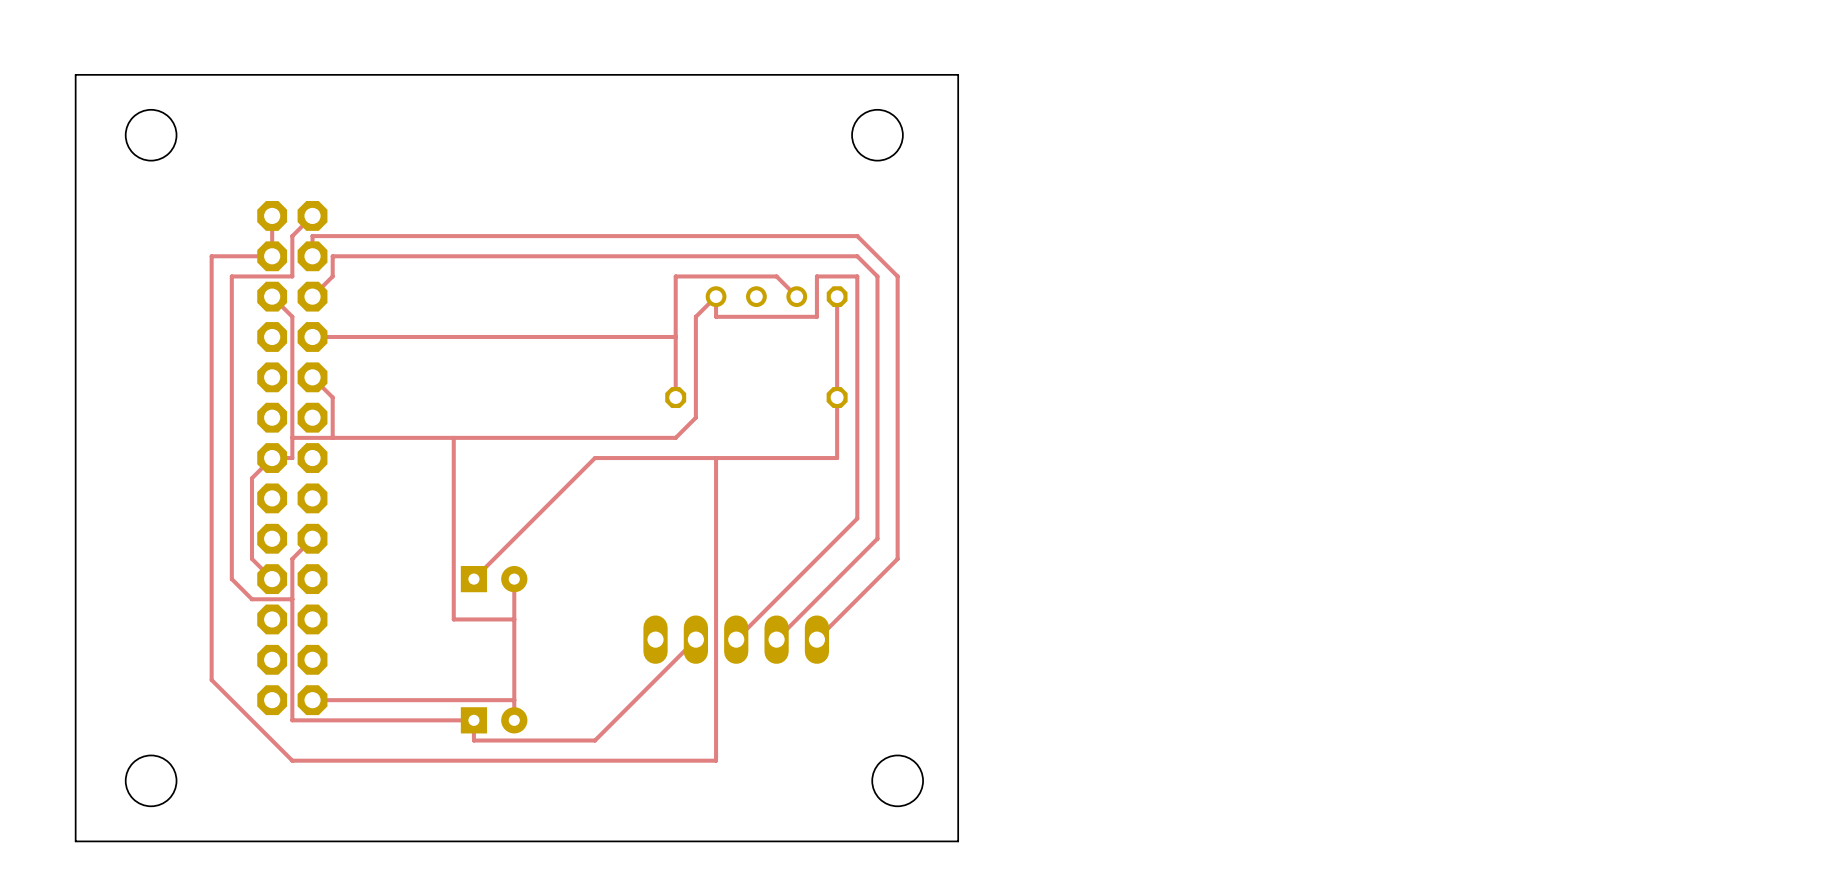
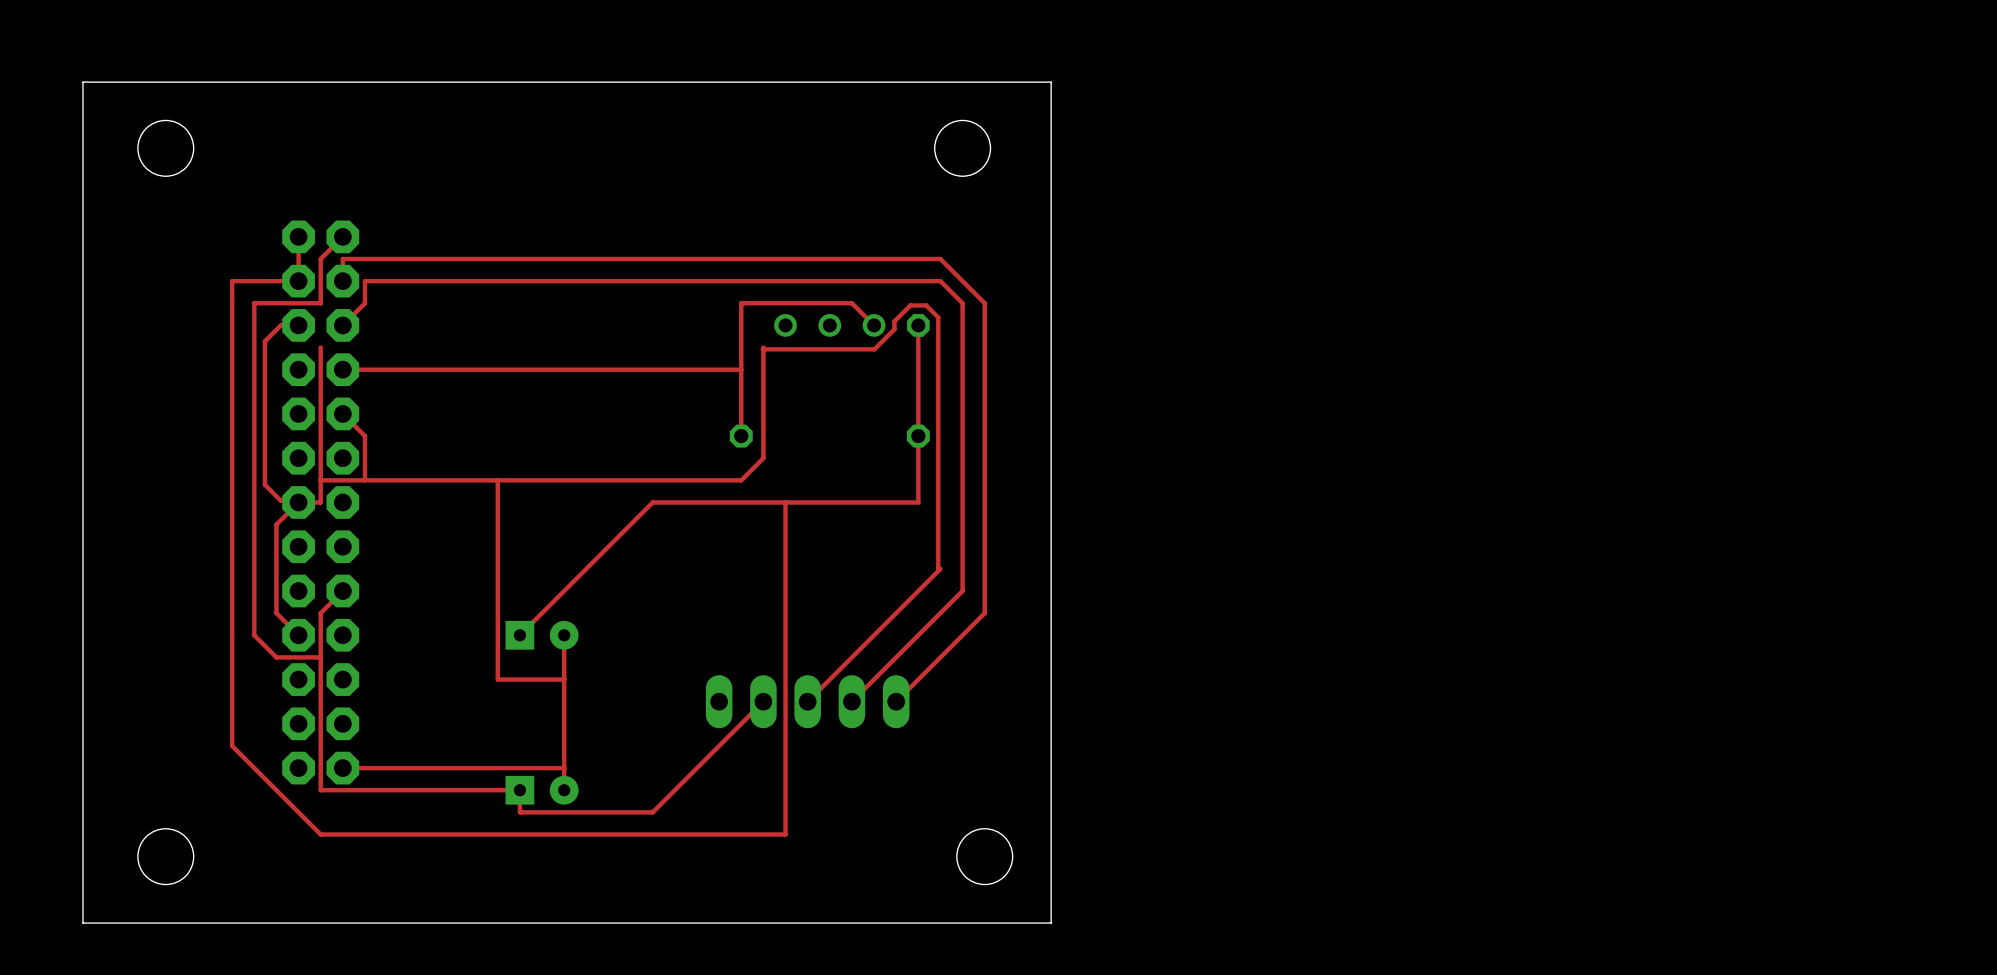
top track: (272, 296) (292, 316) -> (298, 325) (280, 325) (264, 341) (264, 484) (280, 500) (296, 500) (298, 502)
top track: (695, 316) (716, 296) (716, 316) (816, 316) (816, 276) (857, 276) (857, 518) -> none
top track: none -> (762, 349) (874, 349) (894, 329) (894, 321) (910, 305) (926, 305) (938, 317) (939, 569)

